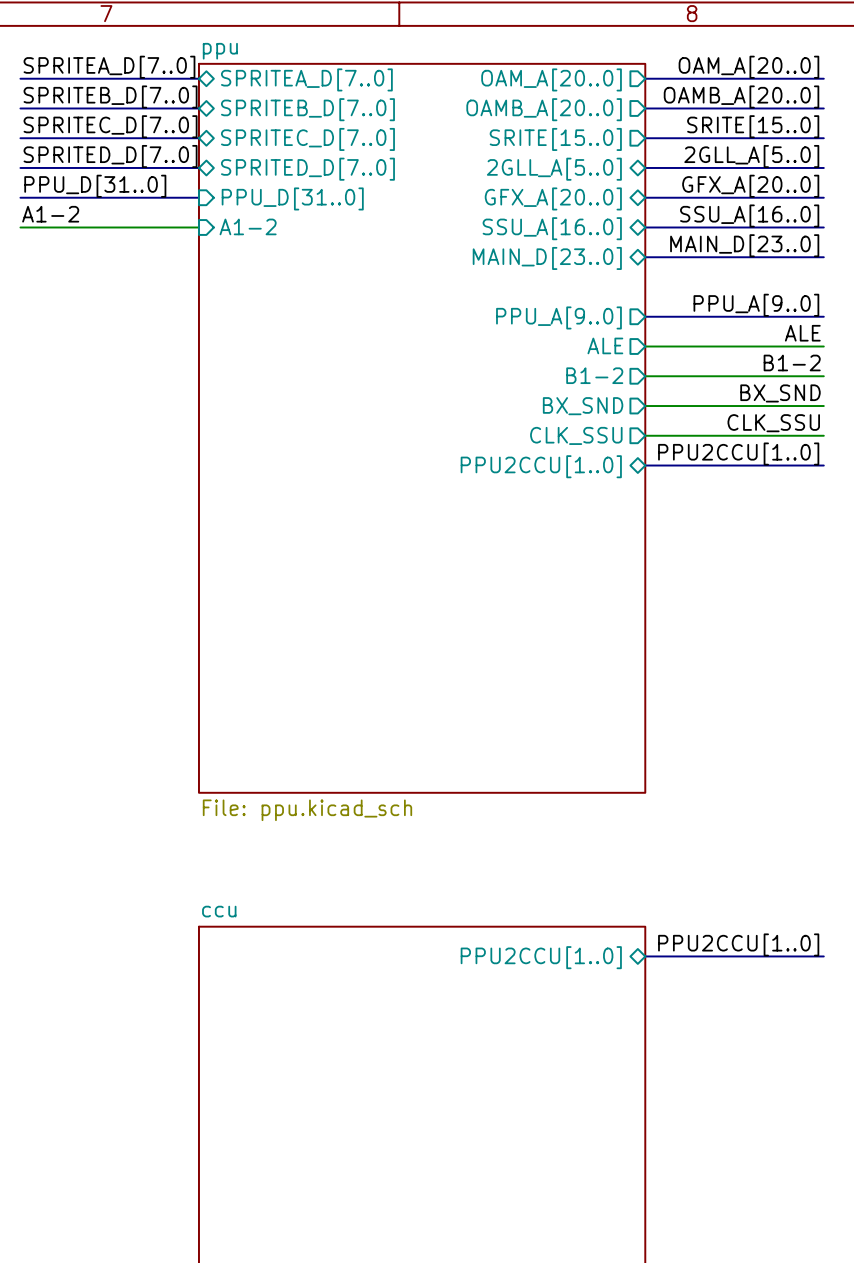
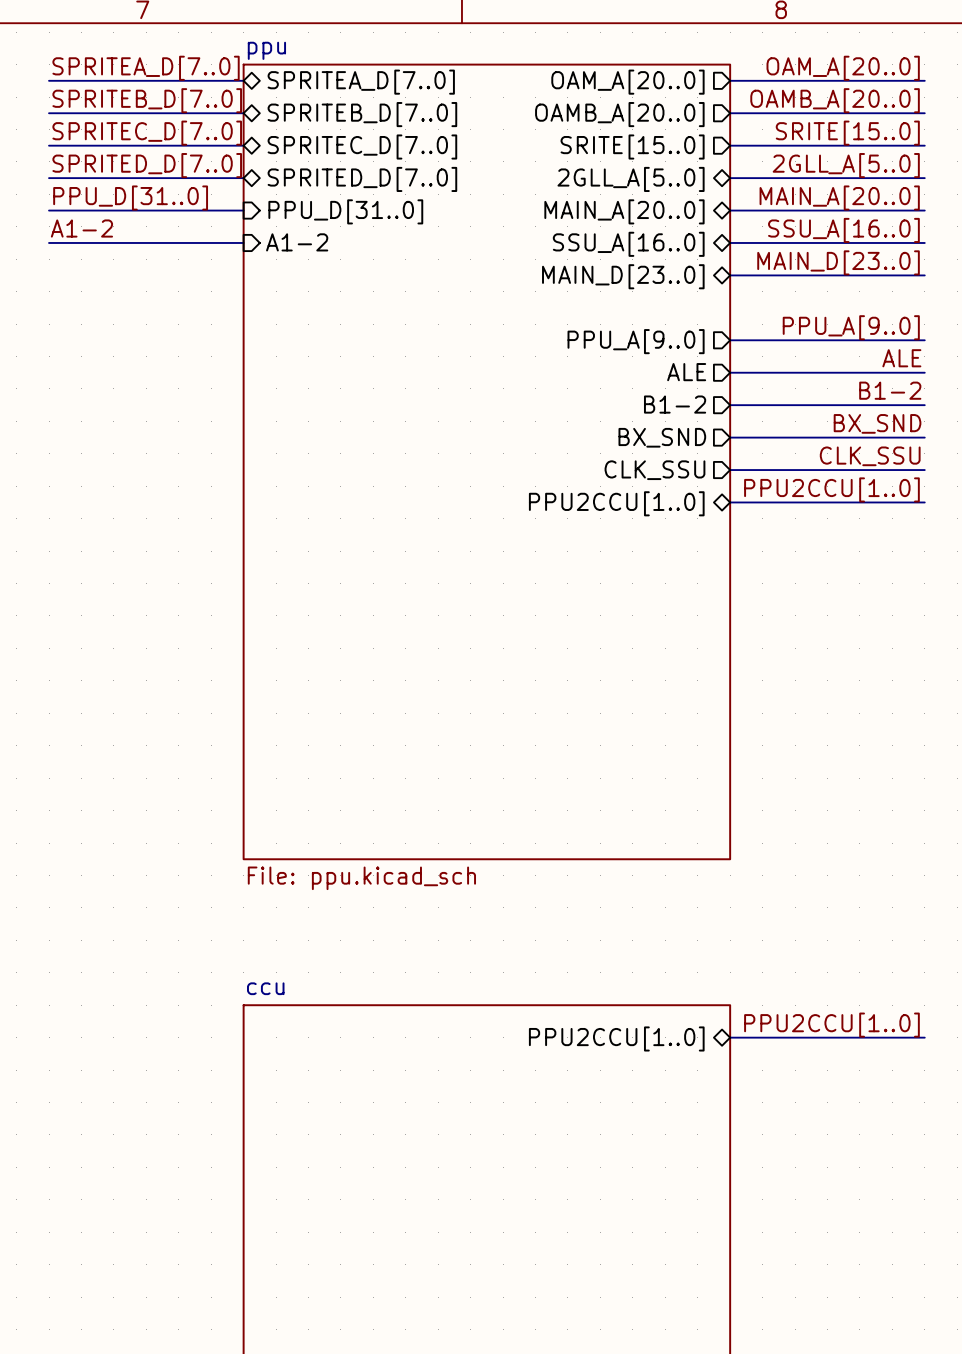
label: GFX_A[20..0] (750, 186) -> MAIN_A[20..0] (839, 198)
sheet pin: GFX_A[20..0] (553, 198) -> MAIN_A[20..0] (624, 211)

